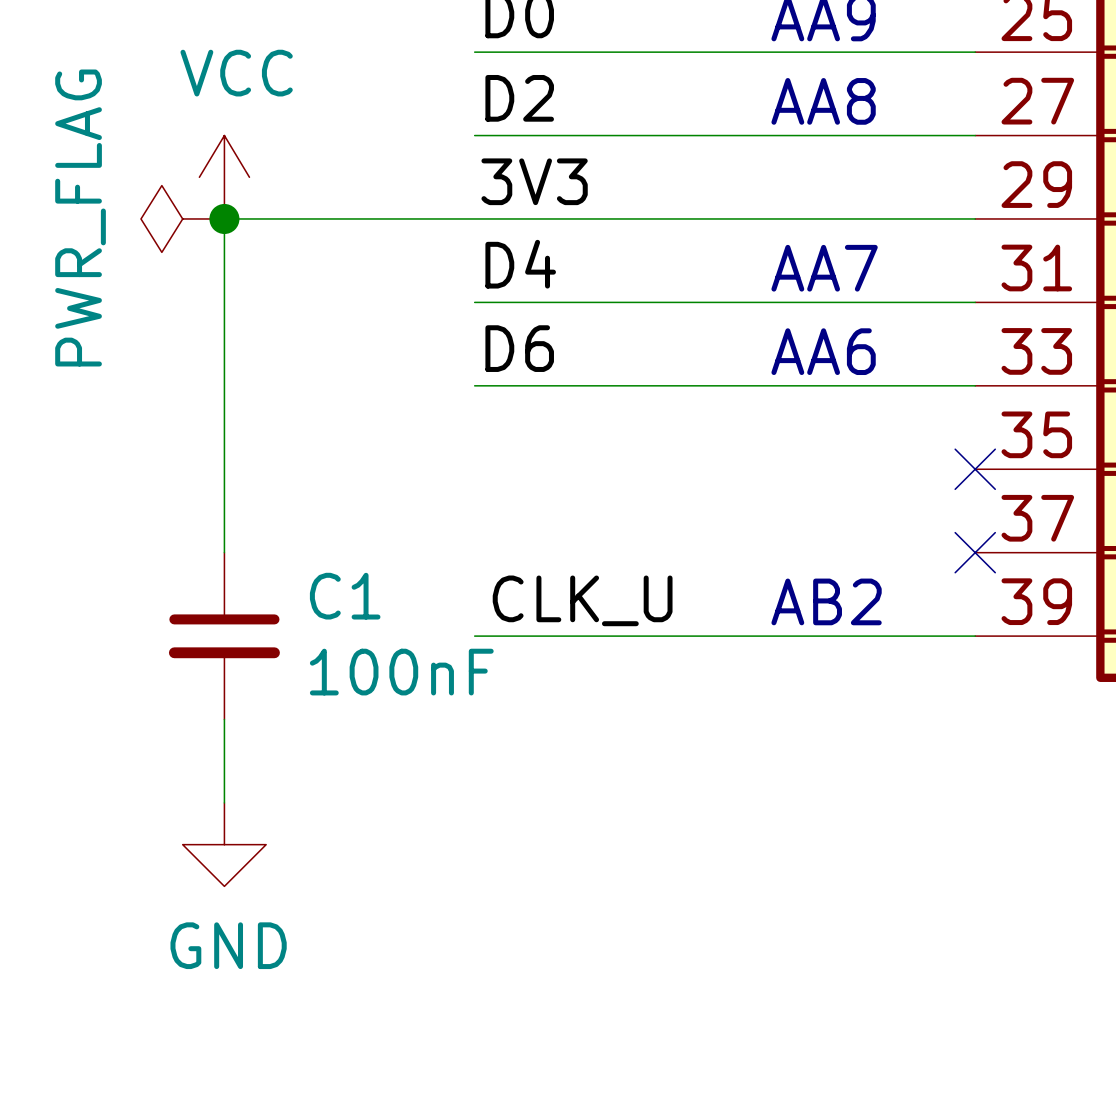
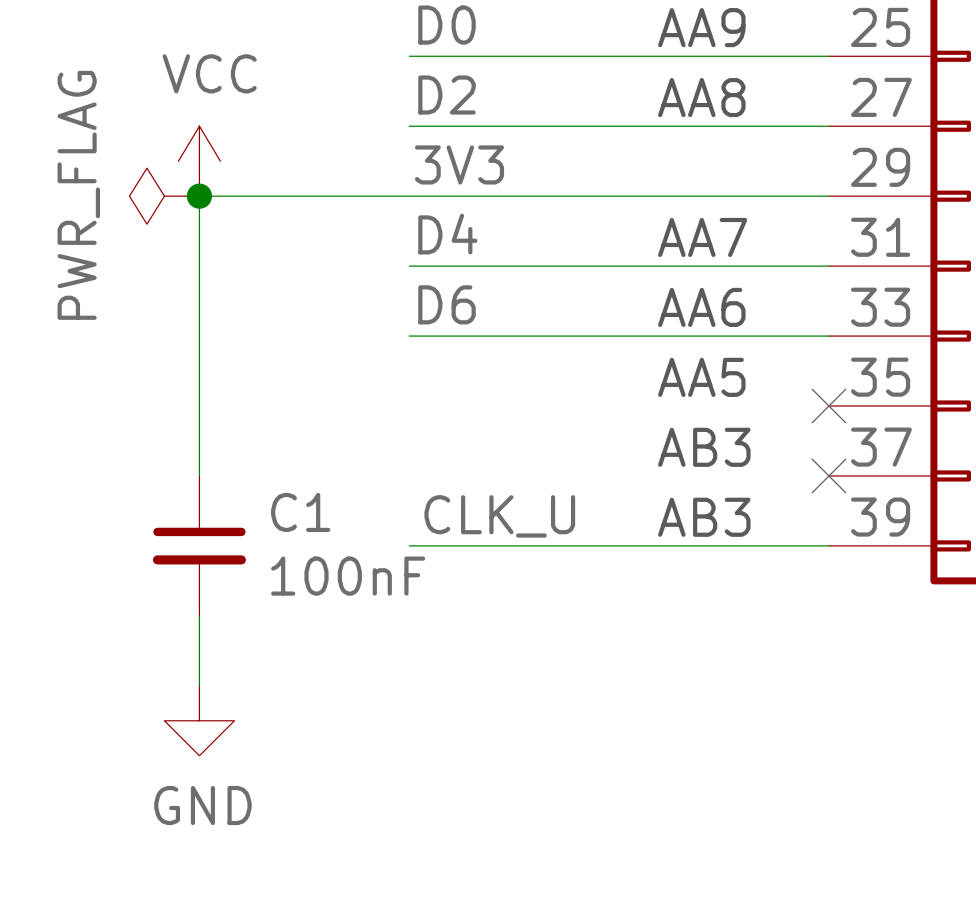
text: none -> AA5 (701, 377)
text: none -> AB3 (704, 447)
text: AB2 (826, 601) -> AB3 (704, 517)

